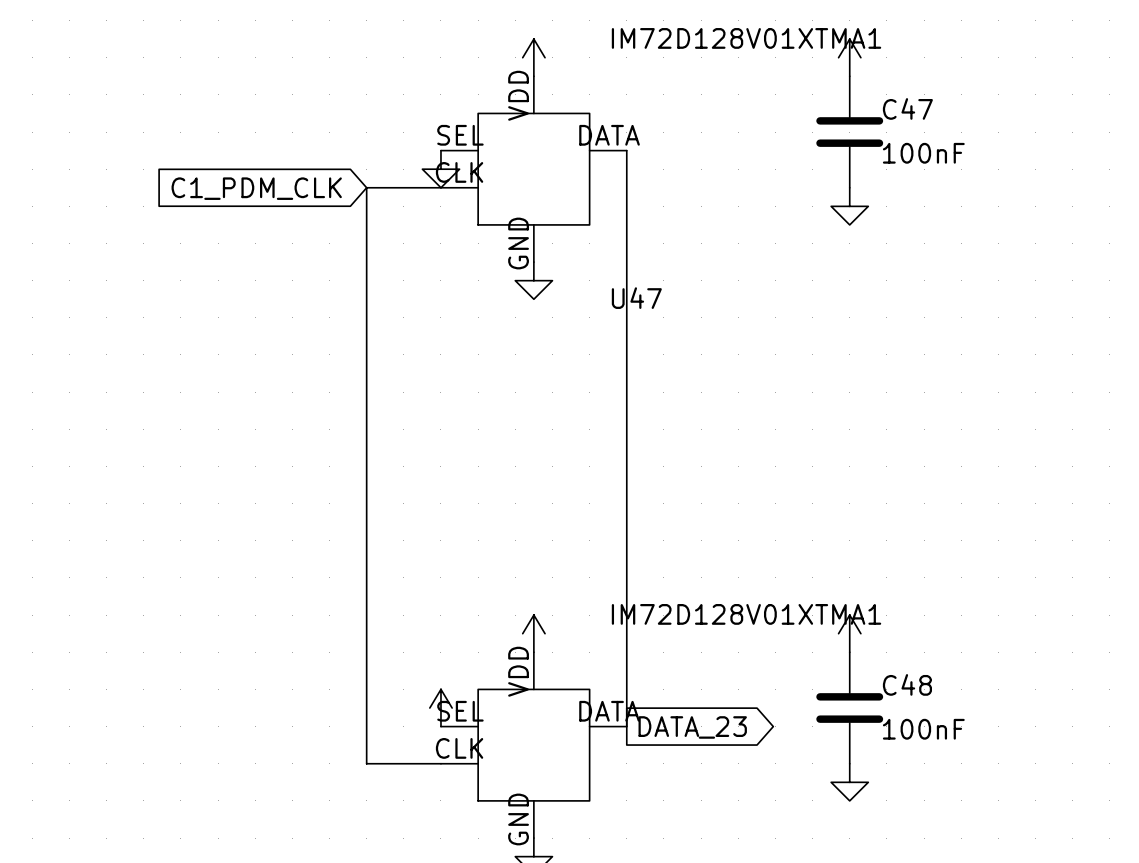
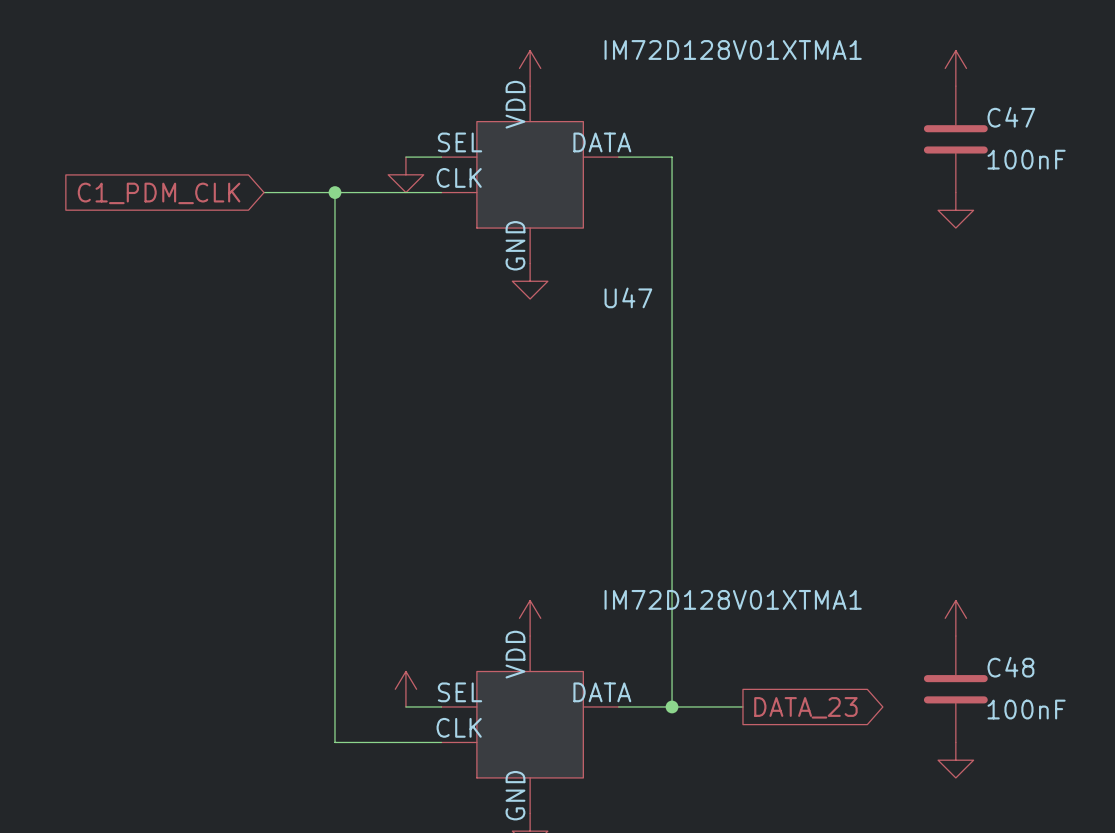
power symbol position: (849, 57) -> (955, 68)
C47 position: (849, 132) -> (955, 139)
wire: none -> (405, 157) (441, 157)
wire: (626, 150) (626, 726) -> (618, 157) (672, 157) (672, 706)
power symbol position: (440, 169) -> (405, 174)
wire: none -> (264, 192) (370, 192)
junction: none -> (334, 192)
wire: (366, 187) (366, 763) -> (334, 192) (334, 742) (370, 742)
global label position: C1_PDM_CLK (256, 188) -> C1_PDM_CLK (159, 193)
power symbol position: (849, 206) -> (955, 210)
power symbol position: (849, 633) -> (955, 618)
power symbol position: (440, 708) -> (405, 689)
C48 position: (849, 708) -> (955, 689)
wire: none -> (405, 706) (441, 706)
wire: none -> (618, 706) (742, 706)
junction: none -> (672, 706)
global label position: DATA_23 (692, 727) -> DATA_23 (805, 707)
power symbol position: (849, 782) -> (955, 760)

